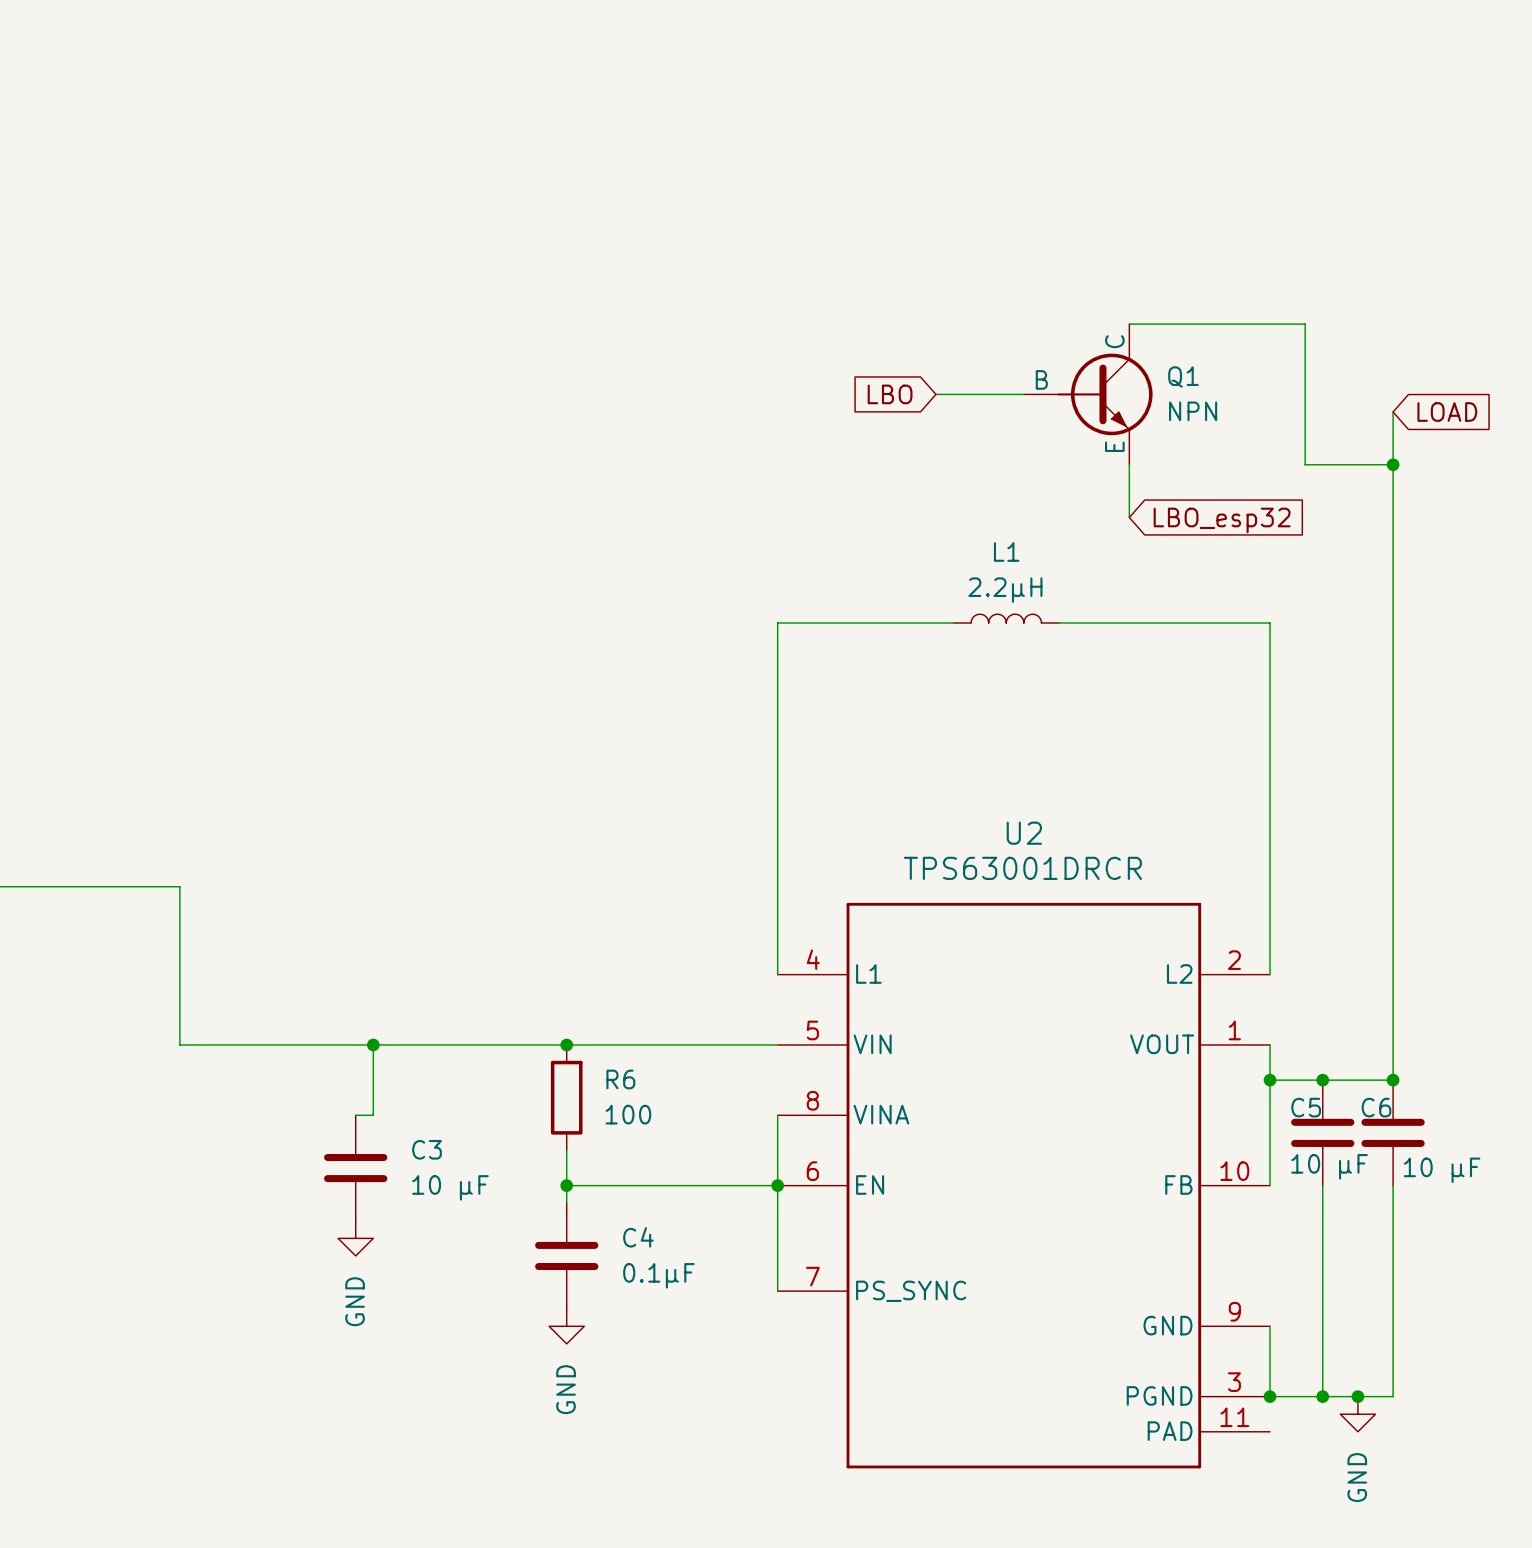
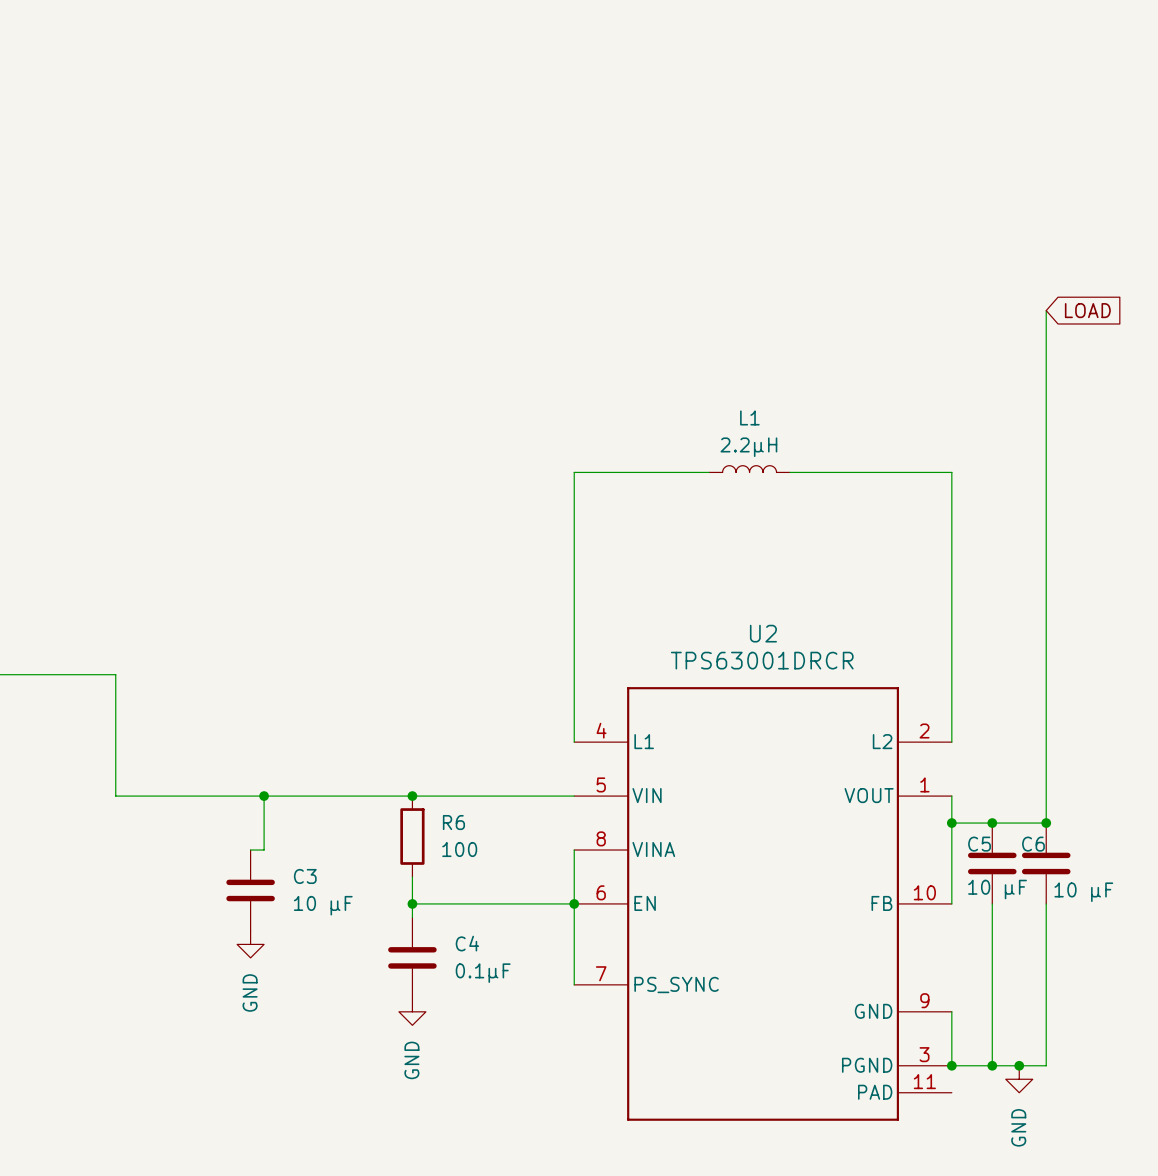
wire: (1129, 324) (1305, 324) (1305, 464) (1393, 464) -> none
global label: LBO (890, 394) -> none
wire: (935, 394) (1023, 394) -> none
Q1: NPN (1088, 394) -> none
wire: (1129, 464) (1129, 517) -> none
junction: (1393, 464) -> none
global label: LBO_esp32 (1222, 520) -> none

